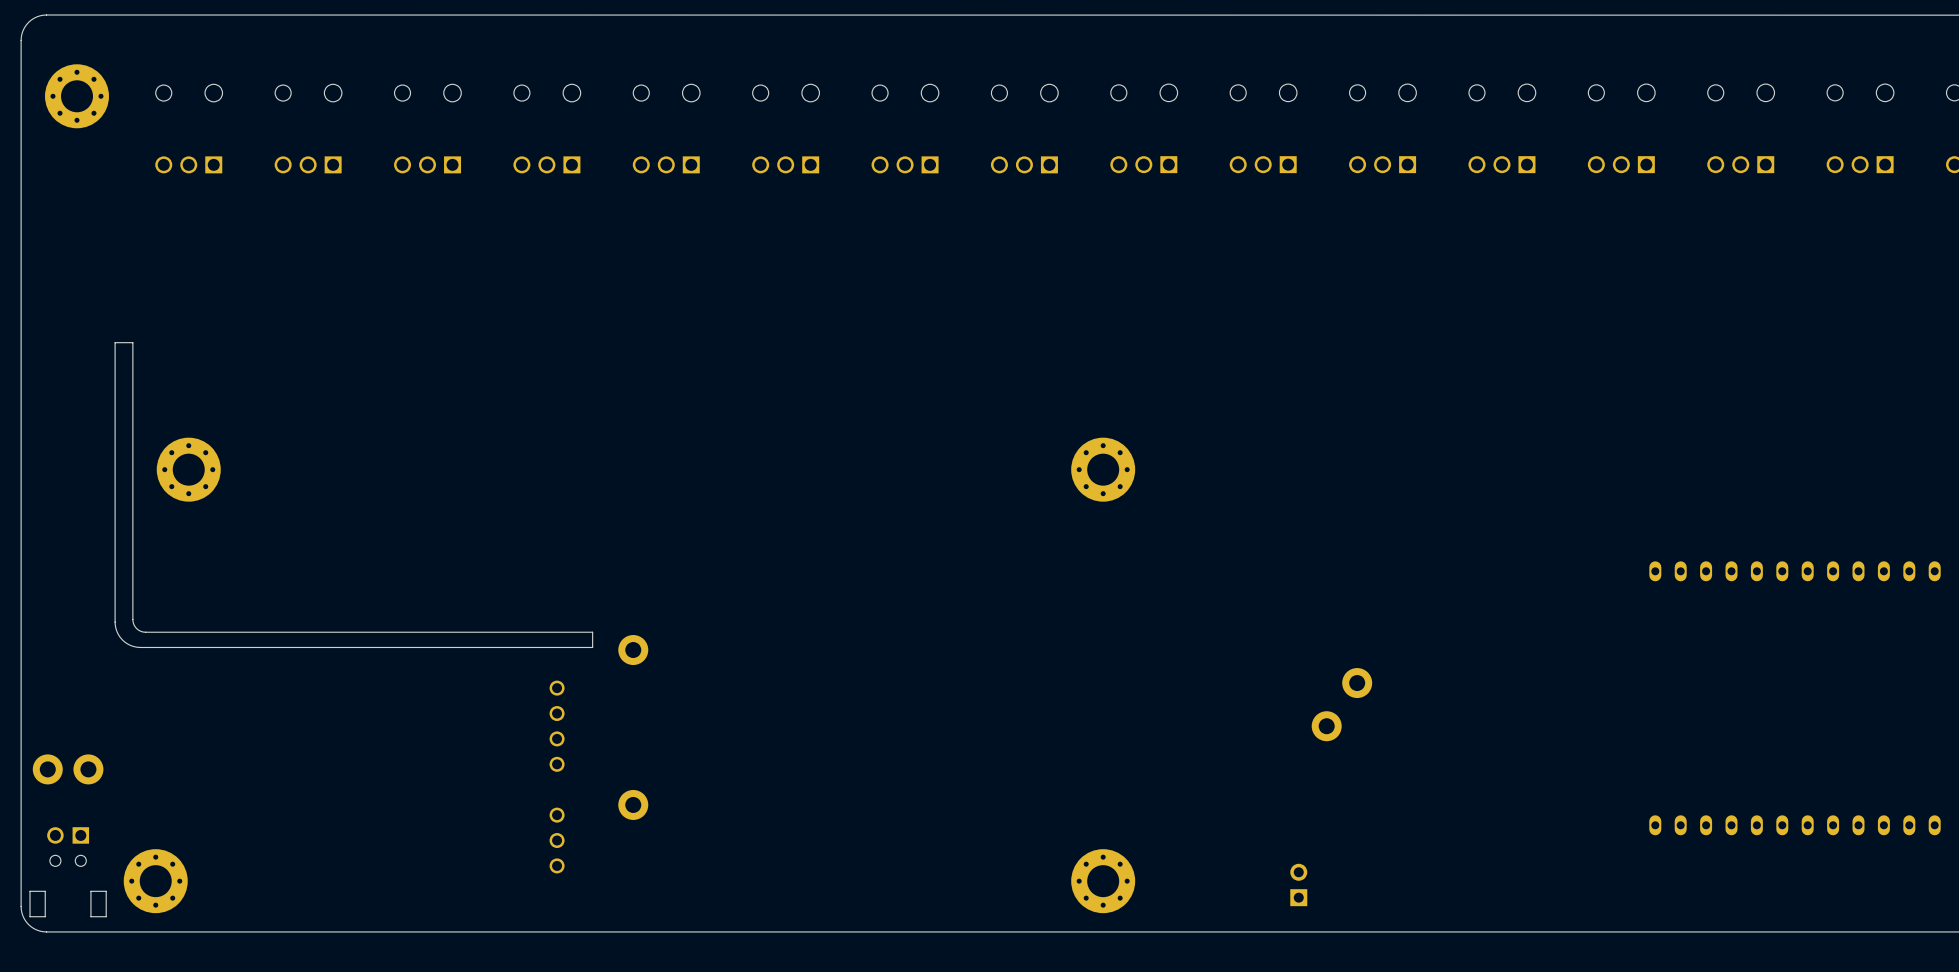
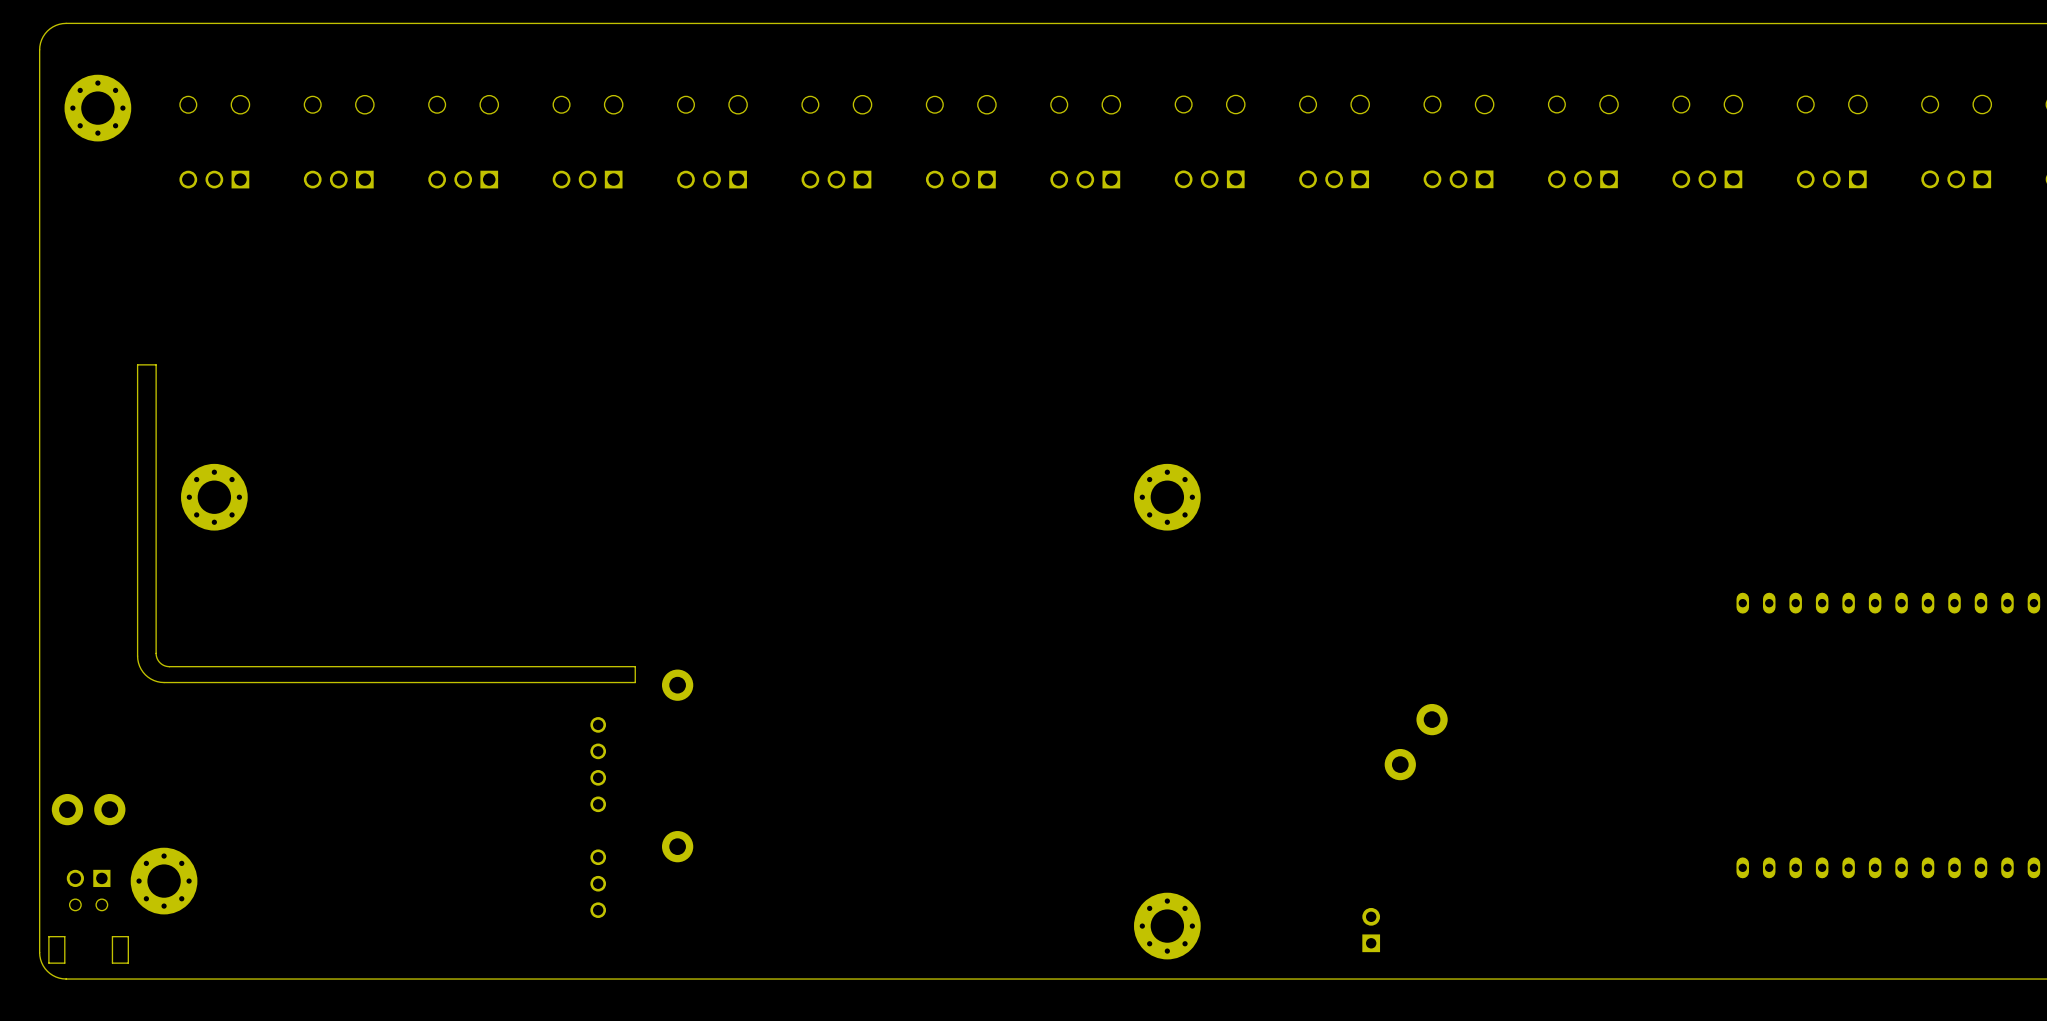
part position: (155, 881) -> (164, 881)

